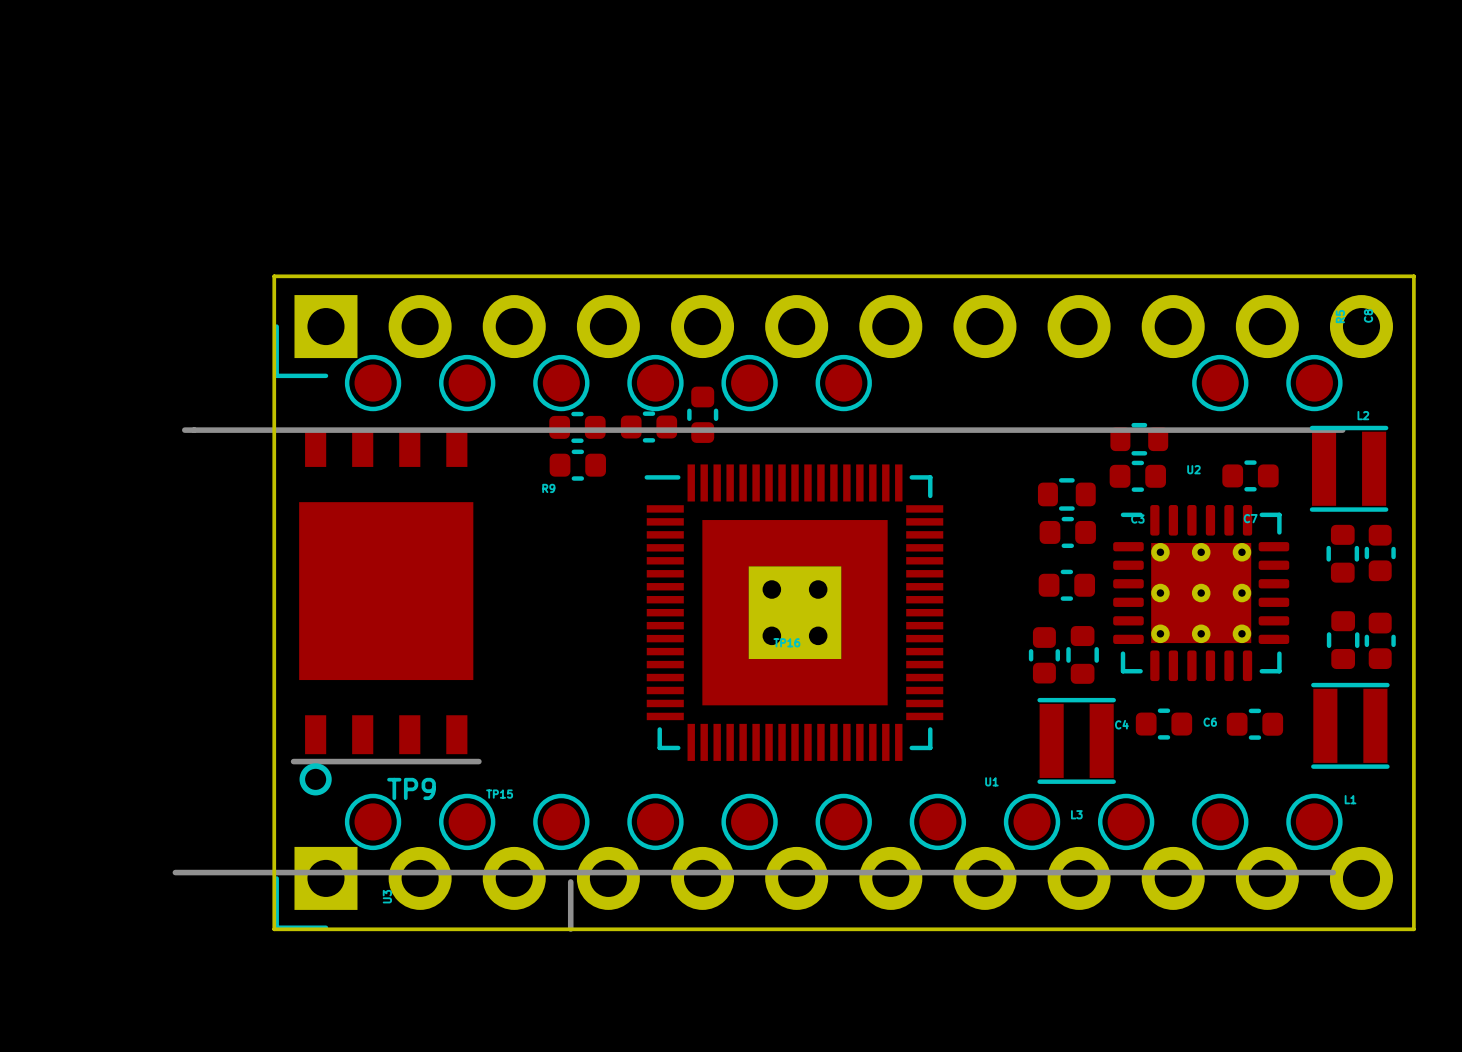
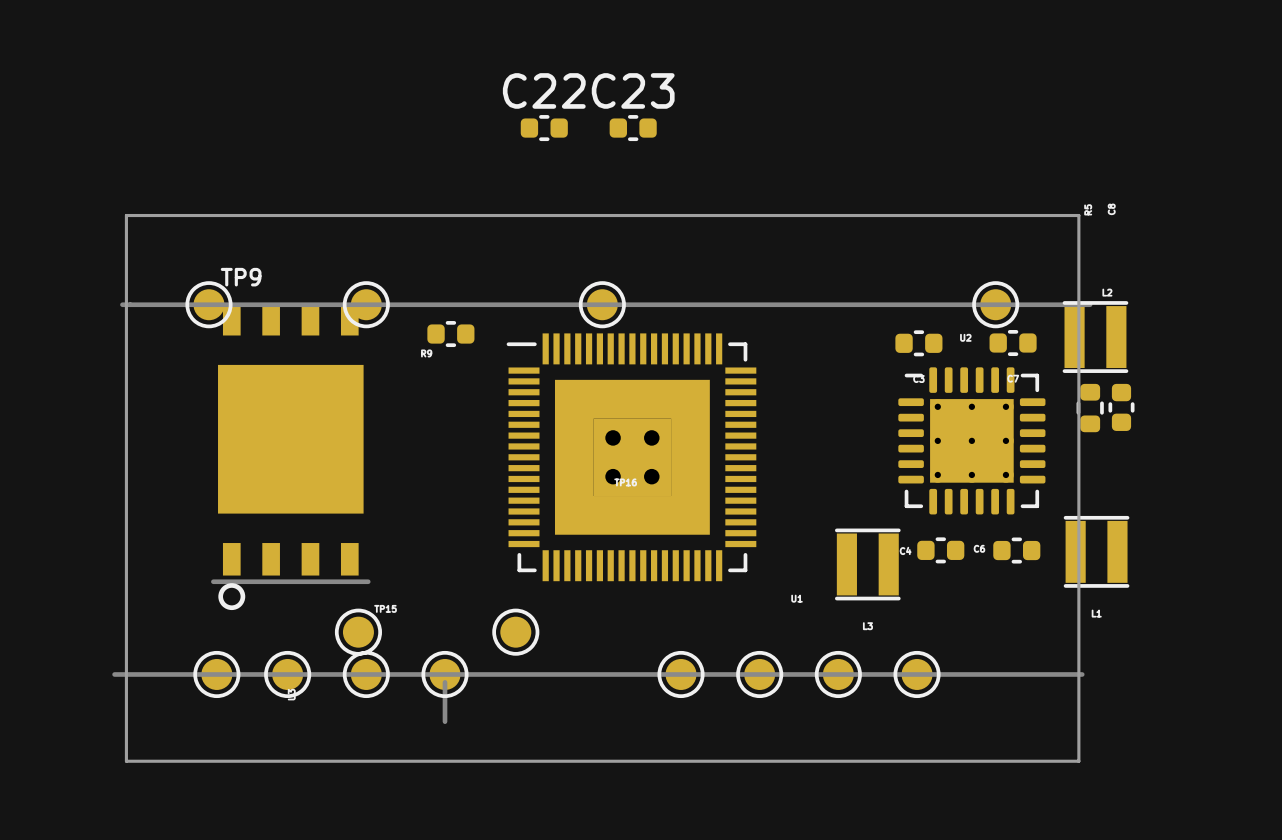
C22: none -> (544, 128)
C23: none -> (633, 128)
board edge: (274, 276) (1413, 276) (1413, 929) (274, 929) (274, 276) -> (126, 215) (1078, 215) (1078, 761) (126, 761) (126, 215)
part: (833, 336) -> none
part: (373, 383) -> none
part position: (467, 383) -> (366, 304)
part: (561, 383) -> none
part: (655, 383) -> none
part position: (749, 383) -> (602, 304)
part: (843, 383) -> none
part position: (1220, 383) -> (995, 304)
part: (1314, 383) -> none
part: (702, 414) -> none
part: (577, 427) -> none
part: (648, 427) -> none
part: (1139, 439) -> none
part: (1066, 494) -> none
part: (1067, 532) -> none
part: (1066, 585) -> none
part: (1343, 640) -> none
part: (1380, 640) -> none
part: (1082, 654) -> none
part: (1044, 655) -> none
TP9 position: (373, 821) -> (208, 304)
part: (561, 821) -> none
part: (749, 821) -> none
part: (843, 821) -> none
part: (937, 821) -> none
part: (1032, 821) -> none
part: (1126, 821) -> none
part: (1220, 821) -> none
part: (1314, 821) -> none
part footprint: [274, 846, 1393, 930] -> [657, 650, 705, 699]
part: none -> (216, 674)
part: none -> (287, 674)
part: none -> (366, 674)
part: none -> (444, 674)
part: none -> (759, 674)
part: none -> (838, 674)
part: none -> (917, 674)

